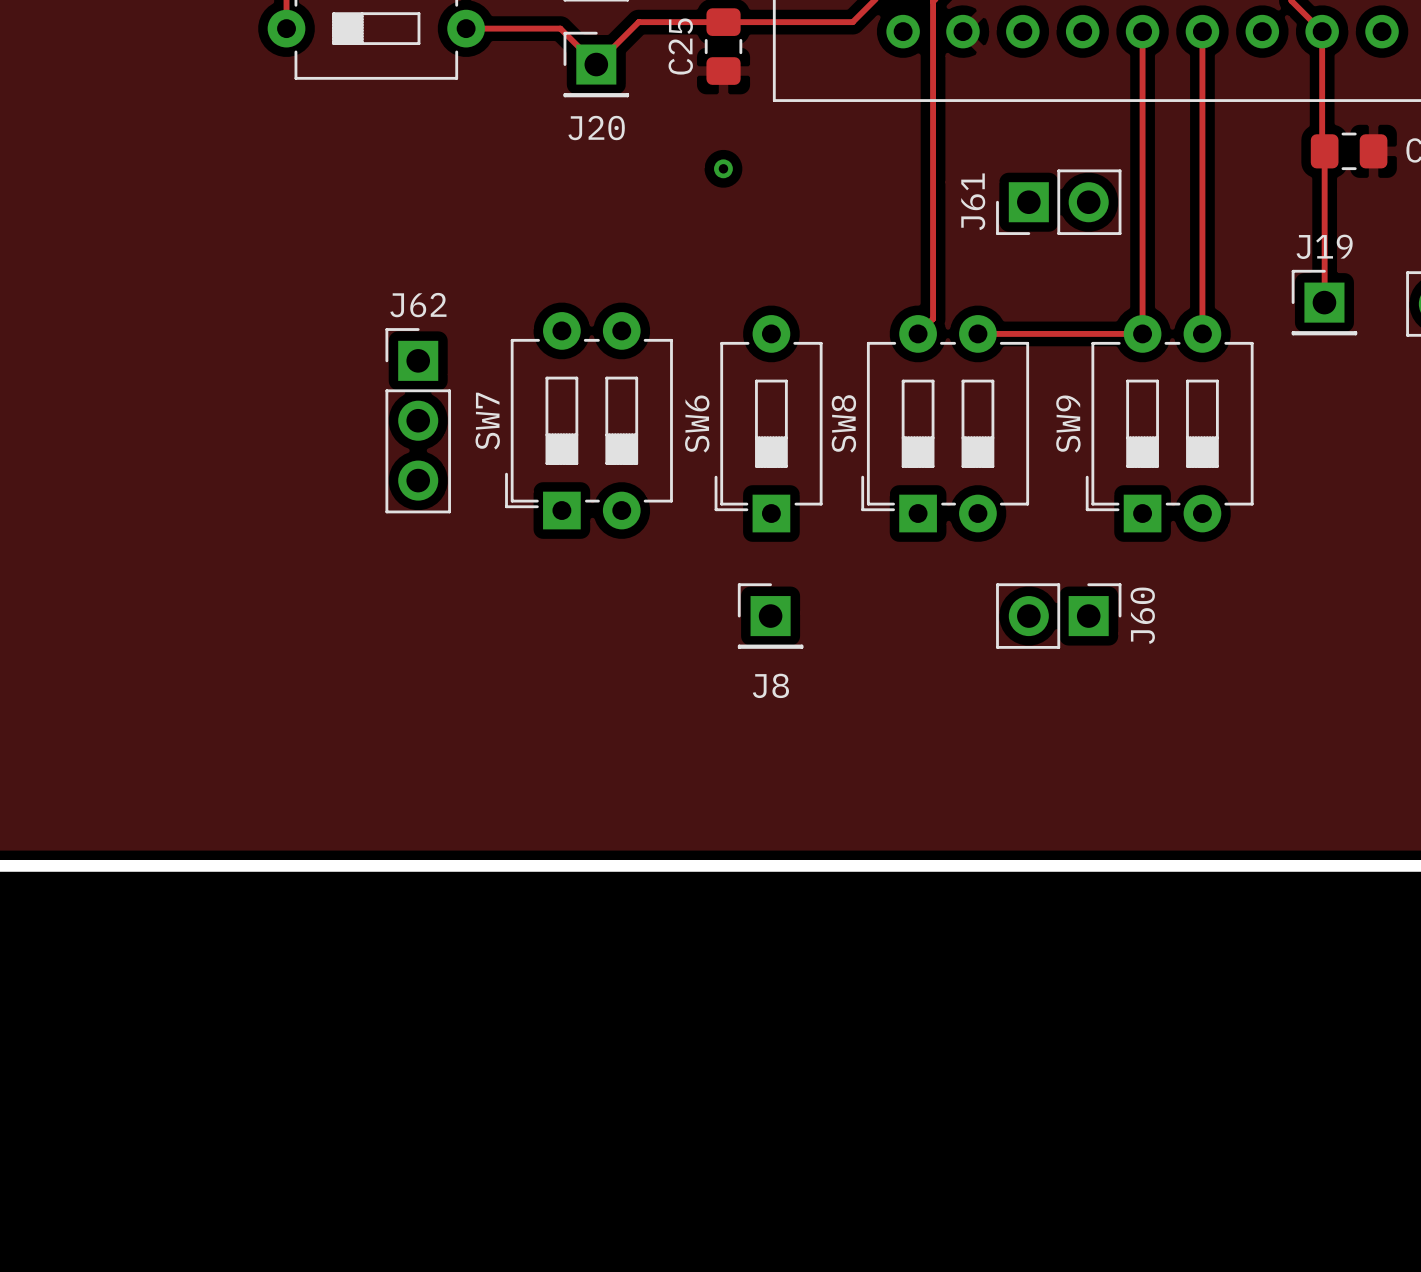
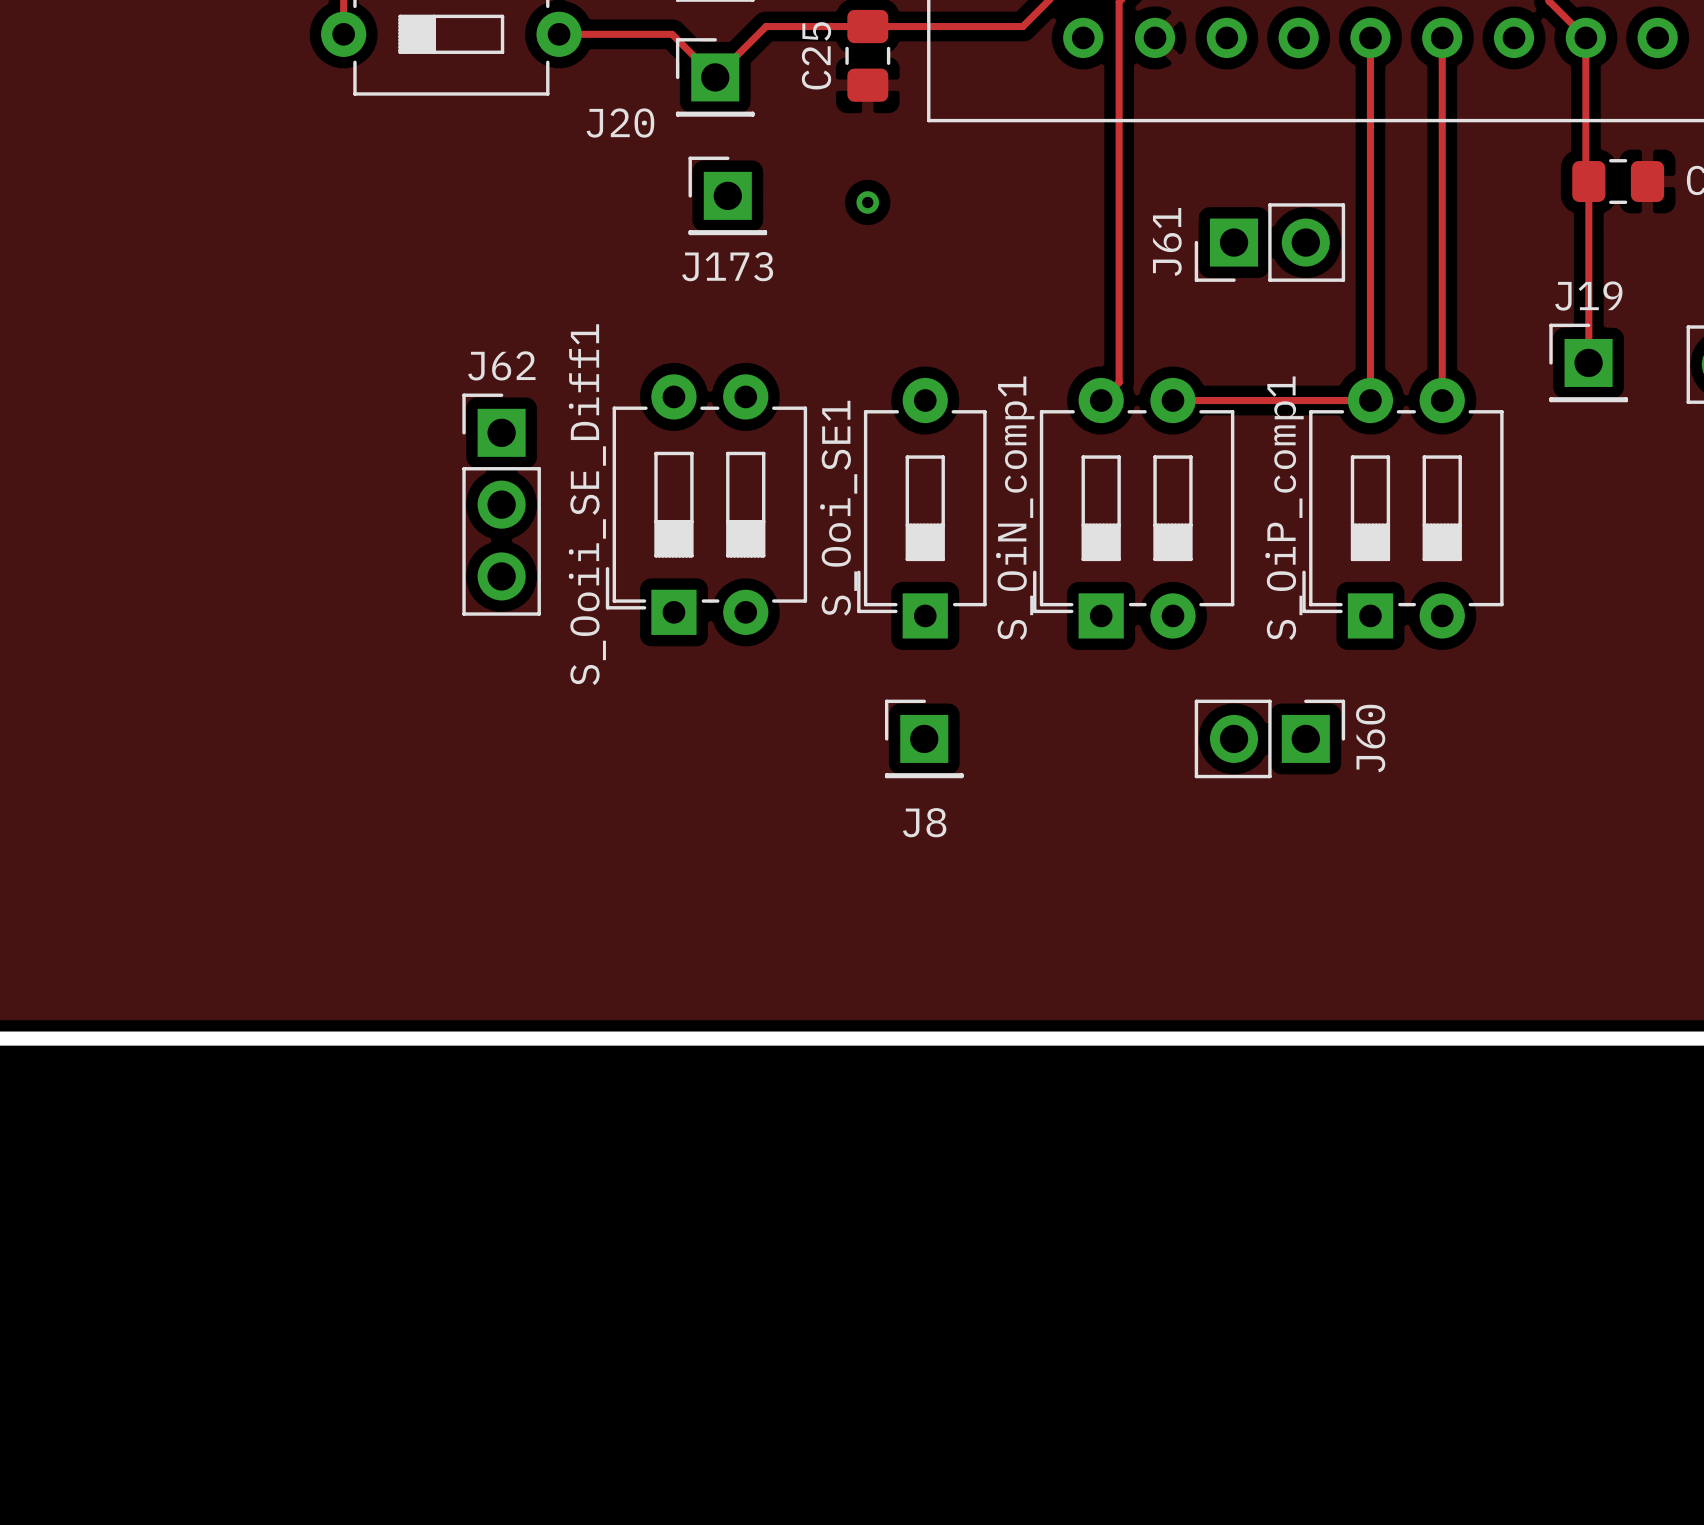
J20 name position: J20 (596, 128) -> J20 (620, 123)
J173: none -> (727, 195)
SW7 name: SW7 (487, 421) -> S_Ooii_SE_Diff1 (587, 504)
SW8 name: SW8 (843, 423) -> S_OiN_comp1 (1015, 508)
SW6 name: SW6 (697, 424) -> S_Ooi_SE1 (838, 508)
SW9 name: SW9 (1068, 424) -> S_OiP_comp1 (1284, 508)

